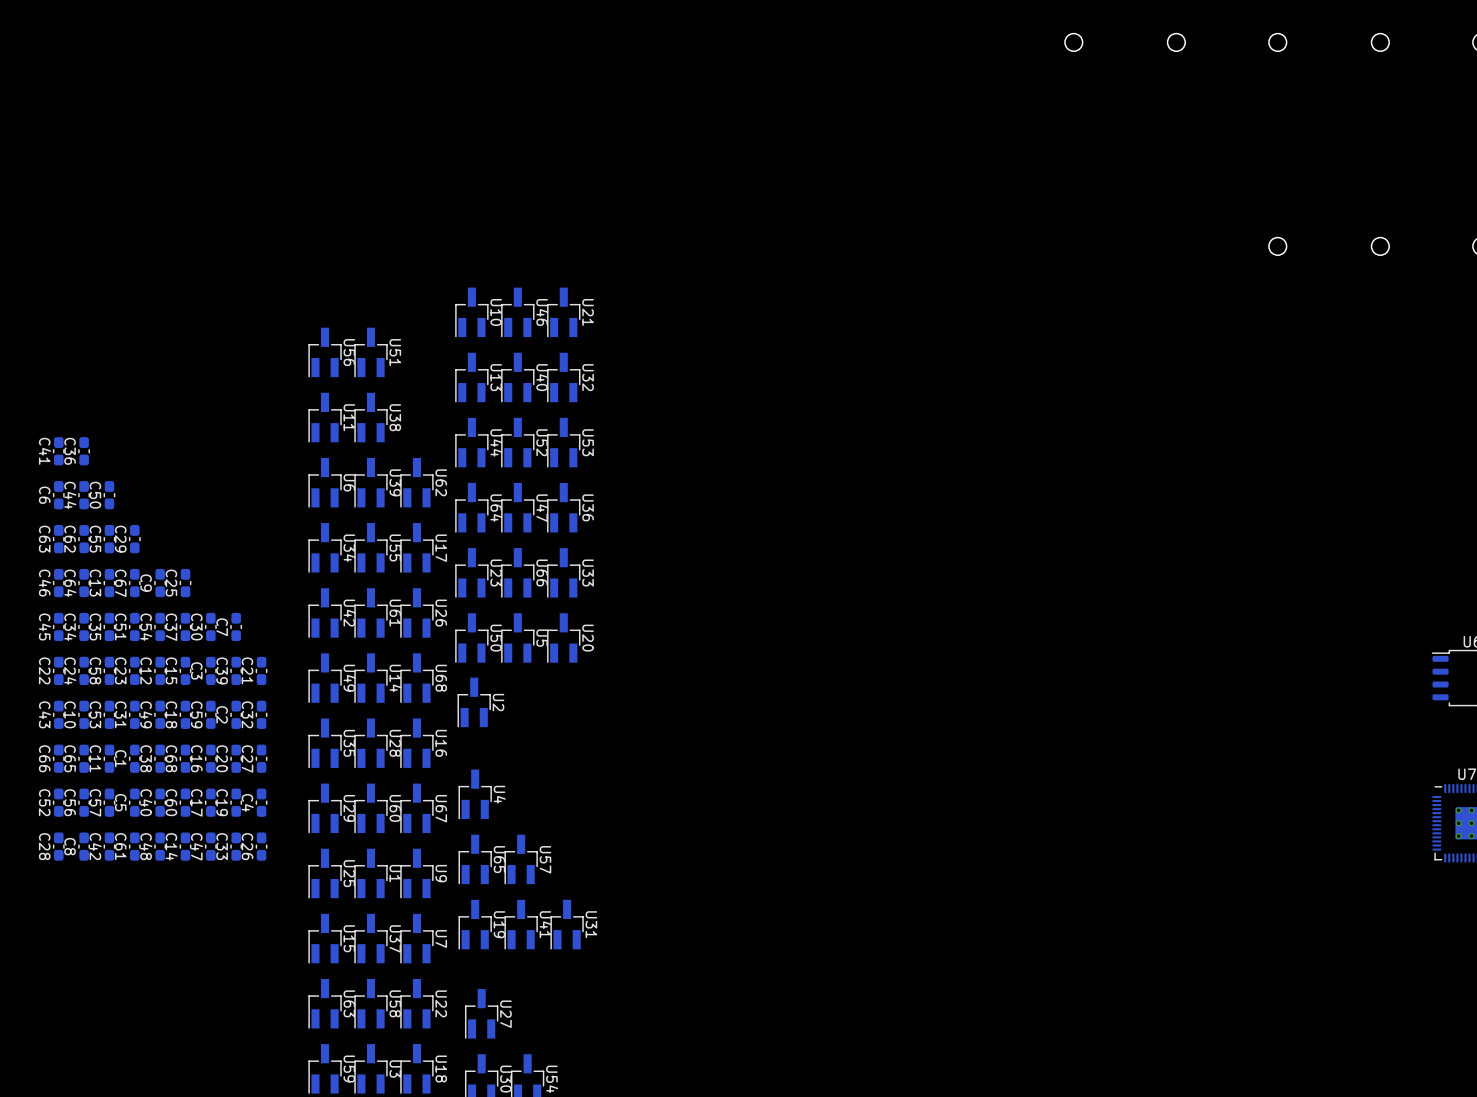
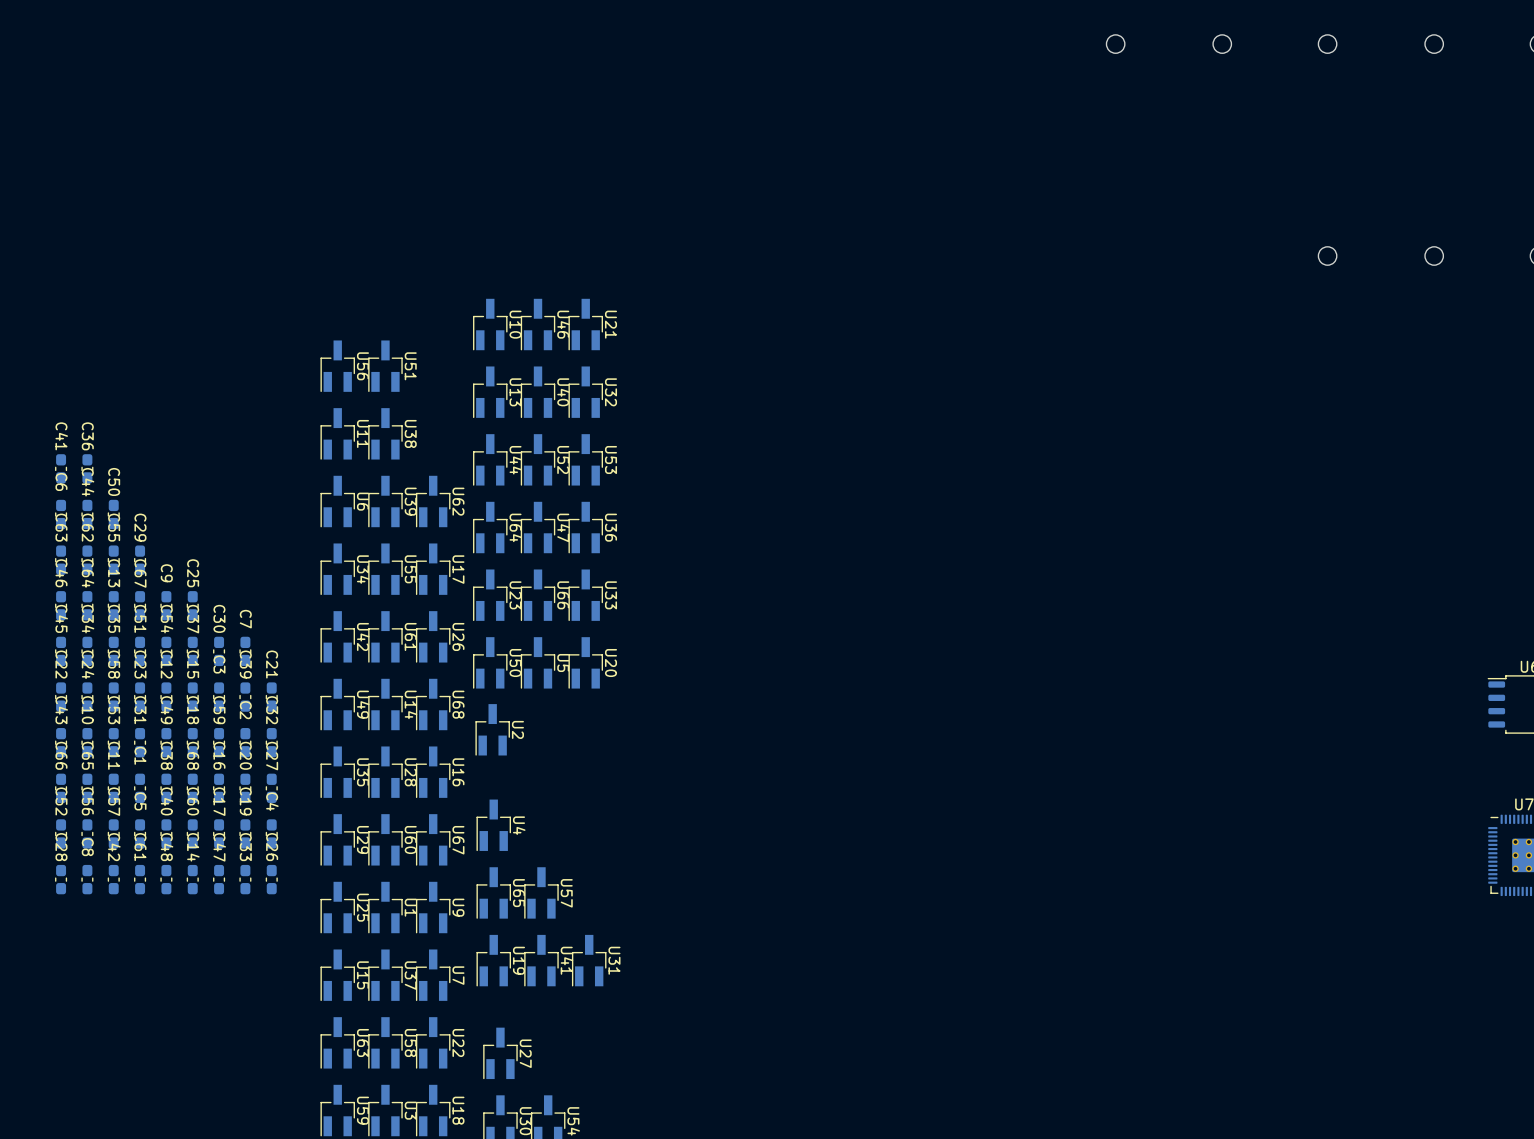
C41 name position: C41 (44, 451) -> C41 (61, 436)
C36 name position: C36 (70, 451) -> C36 (87, 436)
C6 name position: C6 (44, 495) -> C6 (61, 481)
C44 name position: C44 (70, 495) -> C44 (88, 482)
C50 name position: C50 (95, 495) -> C50 (114, 481)
C63 name position: C63 (44, 539) -> C63 (61, 527)
C62 name position: C62 (70, 539) -> C62 (87, 527)
C55 name position: C55 (95, 539) -> C55 (114, 527)
C29 name position: C29 (120, 539) -> C29 (140, 527)
C46 name position: C46 (44, 583) -> C46 (61, 573)
C64 name position: C64 (70, 583) -> C64 (88, 573)
C13 name position: C13 (95, 583) -> C13 (114, 573)
C67 name position: C67 (120, 583) -> C67 (140, 573)
C9 name position: C9 (146, 583) -> C9 (166, 573)
C25 name position: C25 (171, 583) -> C25 (193, 573)
C45 name position: C45 (44, 626) -> C45 (61, 618)
C35 name position: C35 (95, 626) -> C35 (114, 618)
C51 name position: C51 (120, 626) -> C51 (140, 618)
C30 name position: C30 (196, 626) -> C30 (219, 618)
C34 name position: C34 (70, 627) -> C34 (88, 619)
C54 name position: C54 (146, 627) -> C54 (167, 619)
C37 name position: C37 (171, 627) -> C37 (193, 619)
C7 name position: C7 (222, 627) -> C7 (245, 619)
C22 name position: C22 (44, 670) -> C22 (61, 664)
C58 name position: C58 (95, 670) -> C58 (114, 664)
C23 name position: C23 (120, 670) -> C23 (140, 664)
C12 name position: C12 (146, 670) -> C12 (166, 664)
C15 name position: C15 (171, 670) -> C15 (193, 664)
C3 name position: C3 (196, 670) -> C3 (219, 664)
C39 name position: C39 (222, 670) -> C39 (245, 664)
C21 name position: C21 (247, 670) -> C21 (272, 664)
C24 name position: C24 (70, 671) -> C24 (88, 664)
C43 name position: C43 (44, 714) -> C43 (61, 710)
C10 name position: C10 (70, 714) -> C10 (87, 710)
C53 name position: C53 (95, 714) -> C53 (114, 710)
C31 name position: C31 (120, 714) -> C31 (140, 710)
C49 name position: C49 (146, 714) -> C49 (167, 710)
C18 name position: C18 (171, 714) -> C18 (193, 710)
C59 name position: C59 (196, 714) -> C59 (219, 710)
C2 name position: C2 (222, 714) -> C2 (245, 710)
C32 name position: C32 (247, 714) -> C32 (272, 710)
C66 name position: C66 (44, 758) -> C66 (61, 755)
C65 name position: C65 (70, 758) -> C65 (87, 755)
C11 name position: C11 (95, 758) -> C11 (114, 755)
C1 name position: C1 (120, 758) -> C1 (140, 755)
C38 name position: C38 (146, 758) -> C38 (166, 755)
C68 name position: C68 (171, 758) -> C68 (193, 755)
C16 name position: C16 (196, 758) -> C16 (219, 755)
C20 name position: C20 (222, 758) -> C20 (245, 755)
C27 name position: C27 (247, 758) -> C27 (272, 756)
C52 name position: C52 (44, 802) -> C52 (61, 801)
C56 name position: C56 (70, 802) -> C56 (87, 801)
C57 name position: C57 (95, 802) -> C57 (114, 801)
C5 name position: C5 (120, 802) -> C5 (140, 801)
C40 name position: C40 (146, 802) -> C40 (167, 801)
C60 name position: C60 (171, 802) -> C60 (193, 801)
C17 name position: C17 (196, 802) -> C17 (219, 801)
C19 name position: C19 (222, 802) -> C19 (245, 801)
C4 name position: C4 (247, 802) -> C4 (272, 801)
C28 name position: C28 (44, 846) -> C28 (61, 847)
C8 name position: C8 (70, 846) -> C8 (87, 847)
C42 name position: C42 (95, 846) -> C42 (114, 847)
C61 name position: C61 (120, 846) -> C61 (140, 847)
C48 name position: C48 (146, 846) -> C48 (167, 847)
C14 name position: C14 (171, 846) -> C14 (193, 847)
C47 name position: C47 (197, 846) -> C47 (219, 847)
C33 name position: C33 (222, 846) -> C33 (245, 847)
C26 name position: C26 (247, 846) -> C26 (272, 847)

